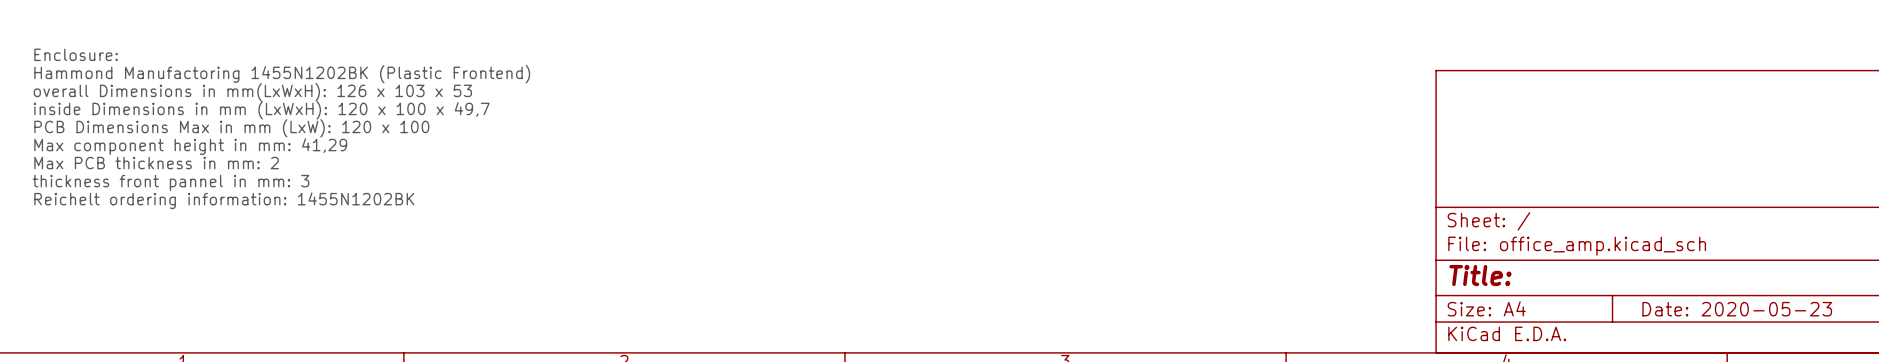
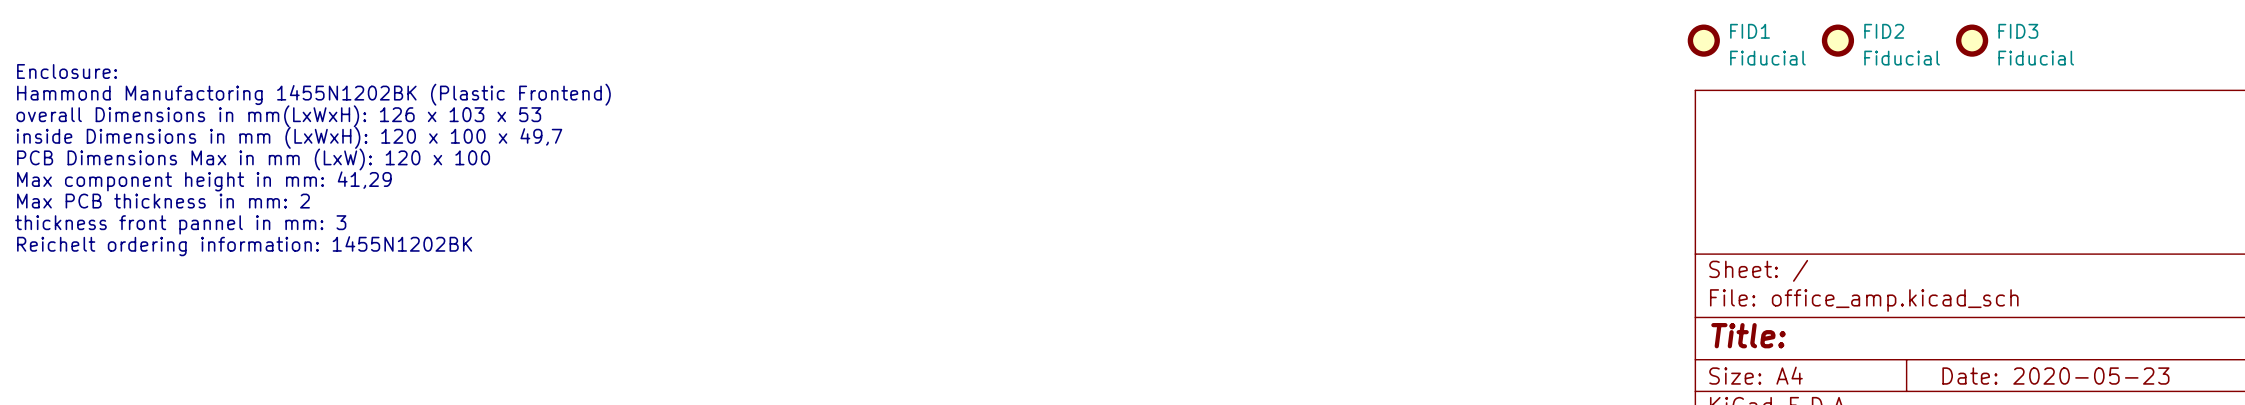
FID1: none -> Fiducial (1703, 40)
FID2: none -> Fiducial (1837, 40)
FID3: none -> Fiducial (1972, 40)

